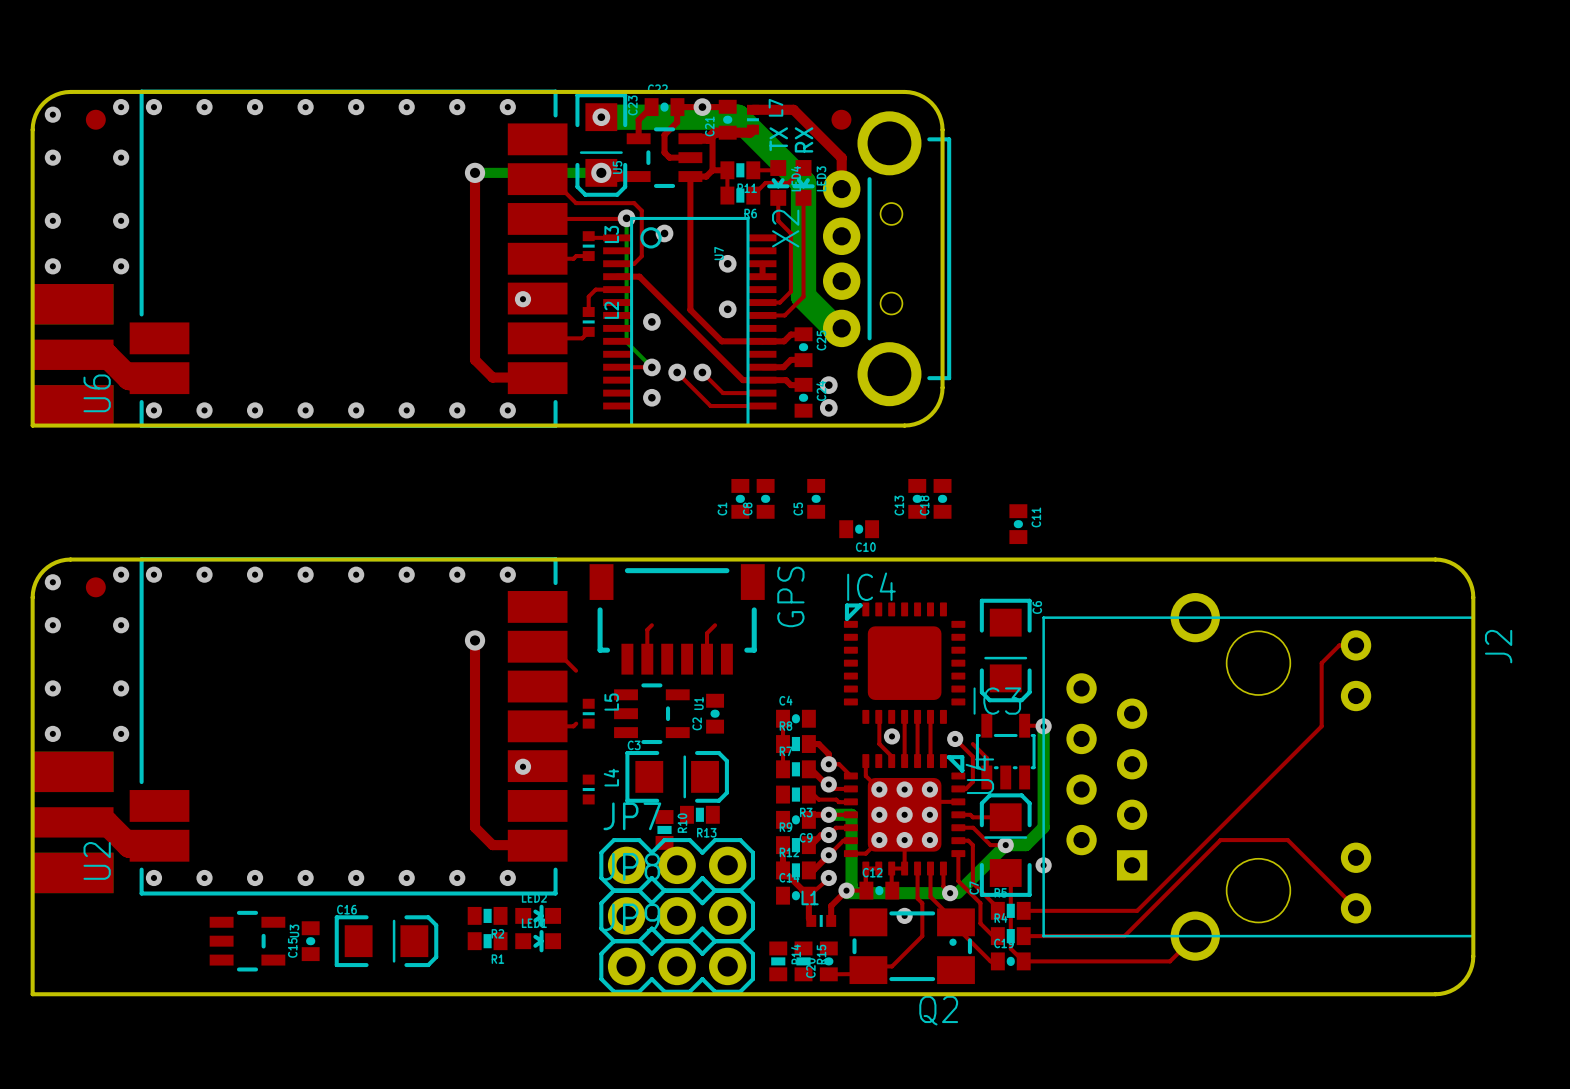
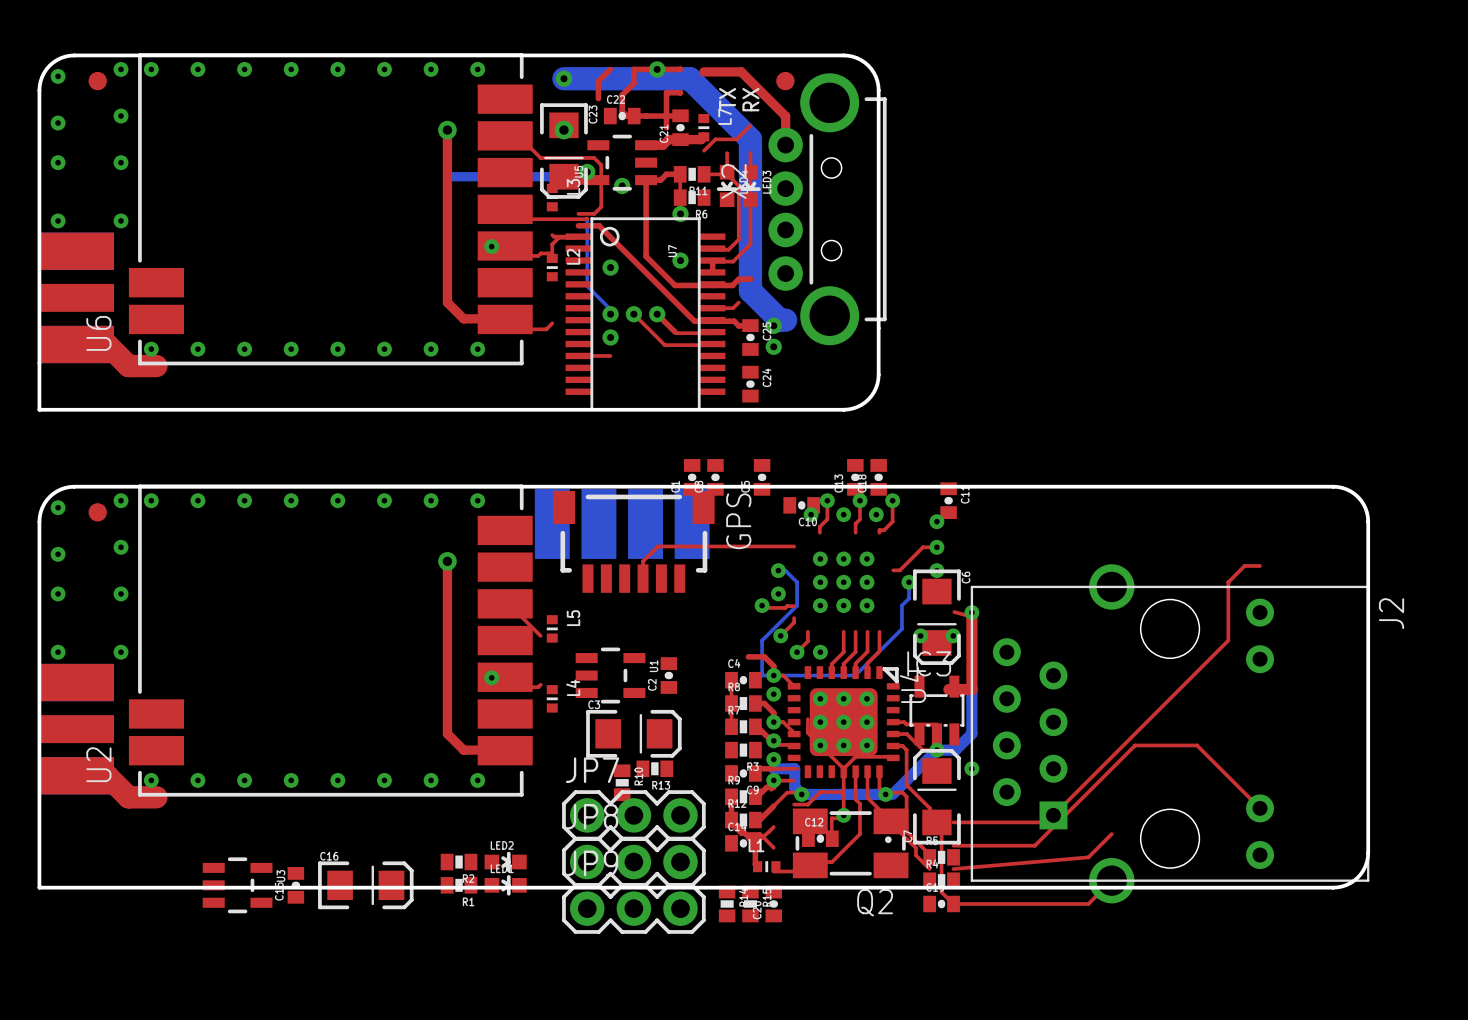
via: none -> (121, 69)
via: none -> (151, 69)
via: none -> (197, 69)
via: none -> (244, 69)
via: none -> (291, 69)
via: none -> (337, 69)
via: none -> (384, 69)
via: none -> (431, 69)
via: none -> (477, 69)
via: none -> (657, 69)
via: none -> (58, 76)
via: none -> (563, 78)
via: (153, 107) -> none
via: (204, 107) -> none
via: (255, 107) -> none
via: (305, 107) -> none
via: (356, 107) -> none
via: (406, 107) -> none
via: (457, 107) -> none
via: (507, 107) -> none
top track: (651, 107) (638, 120) (638, 138) -> (610, 69) (598, 81) (598, 98)
top track: (677, 107) (677, 122) (664, 134) (664, 152) (669, 157) (690, 157) -> (633, 116) (626, 116) (622, 111) (622, 95) (633, 83) (633, 69) (680, 69)
via: (702, 107) -> none
top track: (752, 109) (793, 109) (841, 157) (841, 189) -> (703, 71) (741, 71) (785, 116) (785, 145)
bottom track: (601, 117) (737, 117) (803, 182) -> (563, 78) (689, 78) (750, 139) (750, 185)
via: (601, 117) -> none
part position: (95, 119) -> (97, 81)
part position: (841, 119) -> (785, 81)
top track: none -> (447, 130) (447, 176)
board edge: (32, 129) (35, 115) (43, 103) (56, 94) (70, 91) (904, 91) (919, 94) (931, 103) (939, 115) (942, 129) -> (39, 137) (39, 90) (42, 77) (46, 69) (56, 60) (74, 55) (848, 55) (864, 62) (875, 77) (878, 90) (878, 137)
top track: (727, 132) (712, 132) (712, 170) -> (680, 93) (666, 92) (666, 127)
text position: TX (778, 139) -> TX (727, 99)
text position: RX (804, 139) -> RX (750, 99)
top track: none -> (750, 153) (750, 199)
via: none -> (587, 171)
top track: (803, 168) (788, 182) (765, 182) (753, 195) -> (750, 125) (736, 139) (715, 139) (704, 150)
via position: (475, 172) -> (447, 130)
via position: (601, 172) -> (563, 130)
top track: (537, 179) (552, 179) (576, 203) (634, 203) (641, 210) (641, 256) (634, 263) (617, 263) -> (505, 135) (518, 135) (540, 158) (594, 158) (601, 165) (601, 206) (594, 213) (578, 213)
via: none -> (622, 185)
top track: (778, 197) (778, 220) (790, 233) -> (727, 153) (727, 174) (738, 185) (738, 232)
via: none -> (680, 213)
via: (626, 218) -> none
top track: none -> (578, 225) (599, 225) (694, 321) (734, 321) (738, 325)
via: (664, 233) -> none
top track: (790, 241) (790, 291) (779, 302) (762, 302) -> (738, 239) (728, 249) (712, 249)
L3 position: (588, 246) -> (552, 197)
top track: (803, 246) (803, 296) (790, 309) -> (750, 244) (733, 261) (712, 261)
via: none -> (491, 246)
U6 position: (348, 258) -> (330, 209)
X2 position: (887, 258) -> (827, 209)
top track: (690, 259) (690, 309) (702, 321) -> (646, 256) (675, 285) (732, 285) (738, 279) (750, 278)
via: (52, 266) -> none
via: (121, 266) -> none
via: none -> (610, 267)
top track: (617, 276) (639, 276) (742, 380) (785, 380) (790, 385) (803, 384) -> none
top track: (617, 289) (595, 289) (588, 296) (588, 311) -> (578, 237) (558, 237) (552, 244) (552, 258)
bottom track: (626, 291) (626, 342) (651, 367) -> (587, 286) (610, 309)
via: (522, 299) -> none
top track: (475, 309) (475, 359) (492, 377) (537, 378) -> (447, 302) (463, 318) (505, 319)
via: (727, 309) -> none
L2 position: (588, 321) -> (552, 267)
via: none -> (633, 314)
via: none -> (657, 314)
top track: (790, 334) (784, 341) (721, 341) -> (712, 333) (675, 332)
via: none -> (773, 325)
via: none -> (610, 337)
part position: (73, 354) -> (76, 297)
via: none -> (773, 346)
via: none -> (151, 349)
via: none -> (197, 349)
via: none -> (244, 349)
via: none -> (291, 349)
via: none -> (337, 349)
via: none -> (384, 349)
via: none -> (431, 349)
via: none -> (477, 349)
top track: (803, 359) (790, 359) (783, 367) (762, 367) -> none
via: (651, 367) -> none
top track: (677, 372) (710, 406) (762, 406) -> (633, 314) (664, 345) (712, 345)
via: (677, 372) -> none
top track: (702, 372) (723, 393) (762, 393) -> none
via: (702, 372) -> none
via: (828, 385) -> none
via: (651, 397) -> none
via: (828, 407) -> none
via: (153, 410) -> none
via: (204, 410) -> none
via: (255, 410) -> none
via: (305, 410) -> none
via: (356, 410) -> none
via: (406, 410) -> none
via: (457, 410) -> none
via: (507, 410) -> none
via: none -> (121, 500)
via: none -> (151, 500)
via: none -> (197, 500)
via: none -> (244, 500)
via: none -> (291, 500)
via: none -> (337, 500)
via: none -> (384, 500)
via: none -> (431, 500)
via: none -> (477, 500)
top track: none -> (827, 500) (827, 519) (819, 526) (819, 532)
via: none -> (827, 500)
top track: none -> (860, 500) (860, 519) (855, 523) (855, 532)
via: none -> (860, 500)
top track: none -> (892, 500) (892, 521) (884, 530) (879, 530) (879, 532)
via: none -> (892, 500)
via: none -> (58, 507)
via: none -> (811, 514)
via: none -> (843, 514)
via: none -> (876, 514)
via: none -> (936, 521)
part: none -> (552, 524)
part: none -> (598, 524)
part: none -> (645, 524)
part: none -> (692, 524)
top track: none -> (794, 546) (658, 546) (643, 561) (643, 578)
via: (153, 574) -> none
via: (204, 574) -> none
via: (255, 574) -> none
via: (305, 574) -> none
via: (356, 574) -> none
via: (406, 574) -> none
via: (457, 574) -> none
via: (507, 574) -> none
top track: none -> (936, 547) (922, 547) (899, 570) (893, 570)
via: none -> (936, 547)
part position: (95, 587) -> (97, 512)
via: none -> (820, 558)
via: none -> (843, 558)
via: none -> (867, 558)
top track: none -> (447, 561) (447, 607)
board edge: (32, 597) (35, 582) (43, 570) (56, 562) (70, 559) (1435, 559) (1449, 562) (1462, 570) (1470, 582) (1473, 597) -> (39, 568) (39, 521) (42, 508) (46, 500) (56, 491) (74, 486) (1333, 486) (1350, 491) (1360, 500) (1365, 508) (1368, 521) (1368, 568)
bottom track: none -> (778, 570) (785, 570) (797, 582) (797, 605) (762, 640) (762, 675) (855, 675) (901, 628) (901, 605) (908, 598) (908, 582)
via: none -> (778, 570)
via: none -> (936, 570)
via: none -> (820, 582)
via: none -> (843, 582)
via: none -> (867, 582)
via: none -> (908, 582)
GPS position: (677, 619) -> (633, 541)
top track: (651, 625) (647, 629) (647, 659) -> none
top track: (715, 625) (707, 633) (707, 659) -> none
via: none -> (778, 593)
top track: none -> (762, 605) (764, 607) (794, 606)
via: none -> (762, 605)
via: none -> (820, 605)
via: none -> (843, 605)
via: none -> (867, 605)
via position: (475, 640) -> (447, 561)
top track: none -> (954, 612) (971, 616) (971, 612) (971, 689) (948, 689)
via: none -> (971, 612)
top track: (1356, 645) (1339, 645) (1321, 663) -> (1260, 565) (1244, 565) (1228, 582) (1228, 628)
top track: none -> (794, 618) (794, 622) (780, 635)
IC4: (904, 663) -> none
top track: none -> (807, 631) (807, 641) (797, 652)
top track: none -> (843, 631) (843, 652) (831, 664) (831, 672)
top track: none -> (855, 631) (855, 651) (843, 663) (843, 672)
top track: none -> (867, 631) (867, 651) (855, 663) (855, 672)
top track: none -> (879, 631) (879, 651) (867, 663) (867, 672)
via: none -> (780, 635)
via: none -> (920, 635)
via: none -> (953, 635)
top track: (1321, 675) (1321, 726) (1137, 910) (1023, 910) -> (1228, 640) (1046, 822) (953, 822)
via: none -> (797, 652)
via: none -> (820, 652)
top track: none -> (748, 656) (764, 656) (773, 666) (773, 675) (783, 675) (794, 686)
L5 position: (588, 713) -> (552, 628)
via: none -> (773, 675)
via: none -> (491, 677)
top track: (878, 716) (879, 713) (879, 744) (891, 756) (891, 761) -> none
top track: (904, 716) (904, 761) -> none
top track: (917, 716) (917, 761) -> none
top track: (930, 716) (930, 761) -> none
U2 position: (348, 726) -> (330, 640)
via: (1043, 726) -> none
via: (52, 733) -> none
via: (121, 733) -> none
via: none -> (773, 694)
via: (891, 736) -> none
via: none -> (820, 698)
via: none -> (843, 698)
via: none -> (867, 698)
top track: (955, 738) (972, 756) (972, 781) (965, 788) (958, 788) -> none
via: (955, 738) -> none
top track: (972, 744) (986, 757) (986, 777) -> none
via: none -> (820, 722)
via: none -> (843, 722)
via: none -> (867, 722)
via: (522, 766) -> none
top track: (475, 776) (475, 827) (492, 845) (537, 845) -> (447, 733) (463, 750) (505, 750)
bottom track: (1043, 776) (1043, 827) (1025, 845) (1005, 845) (957, 893) (846, 893) (851, 885) (851, 835) -> (971, 733) (955, 750) (936, 750) (892, 794) (801, 794) (794, 787)
L4 position: (588, 789) -> (552, 698)
top track: none -> (893, 746) (902, 746) (906, 750) (906, 785) (929, 808) (929, 822)
top track: (808, 794) (811, 792) (818, 799) (854, 802) -> none
via: none -> (936, 750)
via: none -> (773, 759)
via: (828, 814) -> none
via: (879, 814) -> none
U4 position: (904, 814) -> (843, 722)
via: (904, 814) -> none
via: (929, 814) -> none
top track: (958, 814) (970, 814) (972, 817) (1005, 817) -> (893, 722) (904, 722) (906, 724) (936, 724)
via: none -> (971, 768)
top track: none -> (855, 771) (855, 799) (860, 803) (860, 834) (832, 862) (813, 862) (804, 871) (773, 871)
top track: none -> (867, 771) (867, 797) (891, 821) (890, 827) (894, 827) (915, 848) (915, 855) (929, 869)
part position: (73, 822) -> (76, 729)
via: none -> (151, 780)
via: none -> (197, 780)
via: none -> (244, 780)
via: none -> (291, 780)
via: none -> (337, 780)
via: none -> (384, 780)
via: none -> (431, 780)
via: none -> (477, 780)
via: none -> (773, 780)
top track: (958, 827) (973, 827) (990, 845) (1005, 845) -> (893, 734) (906, 734) (922, 750) (936, 750)
via: (828, 835) -> none
via: (879, 840) -> none
via: (904, 840) -> none
via: (929, 840) -> none
via: none -> (801, 794)
via: none -> (885, 794)
via: (1005, 845) -> none
top track: (958, 853) (958, 881) (980, 903) (980, 923) (993, 936) (997, 936) -> none
via: (828, 855) -> none
top track: none -> (1260, 808) (1197, 745) (1135, 745) (1034, 845) (953, 845)
via: none -> (843, 815)
via: (1043, 865) -> none
top track: (878, 868) (865, 868) (866, 890) (846, 890) (831, 905) (831, 920) -> none
top track: (917, 868) (917, 898) (922, 903) (922, 936) (891, 966) (872, 966) (864, 974) (828, 974) -> none
top track: (930, 868) (930, 896) (956, 922) (955, 928) (957, 928) (990, 961) (997, 961) -> none
top track: (943, 868) (943, 886) (950, 893) -> (879, 771) (879, 788) (885, 794)
top track: none -> (727, 825) (732, 825) (741, 834) (760, 834) (773, 847)
via: (153, 877) -> none
via: (204, 877) -> none
via: (255, 877) -> none
via: (305, 877) -> none
via: (356, 877) -> none
via: (406, 877) -> none
via: (457, 877) -> none
via: (507, 877) -> none
via: (828, 877) -> none
top track: none -> (1111, 834) (1088, 857) (953, 869)
via: (846, 890) -> none
via: (950, 893) -> none
board edge: (1473, 905) (1473, 956) (1470, 970) (1465, 979) (1454, 989) (1435, 994) (32, 994) (32, 943) -> (1368, 852) (1365, 866) (1357, 877) (1346, 885) (1333, 887) (39, 887)
top track: (1356, 908) (1287, 840) (1220, 840) (1124, 936) (1023, 936) -> none
via: (904, 915) -> none
Q2 position: (912, 946) -> (850, 843)

